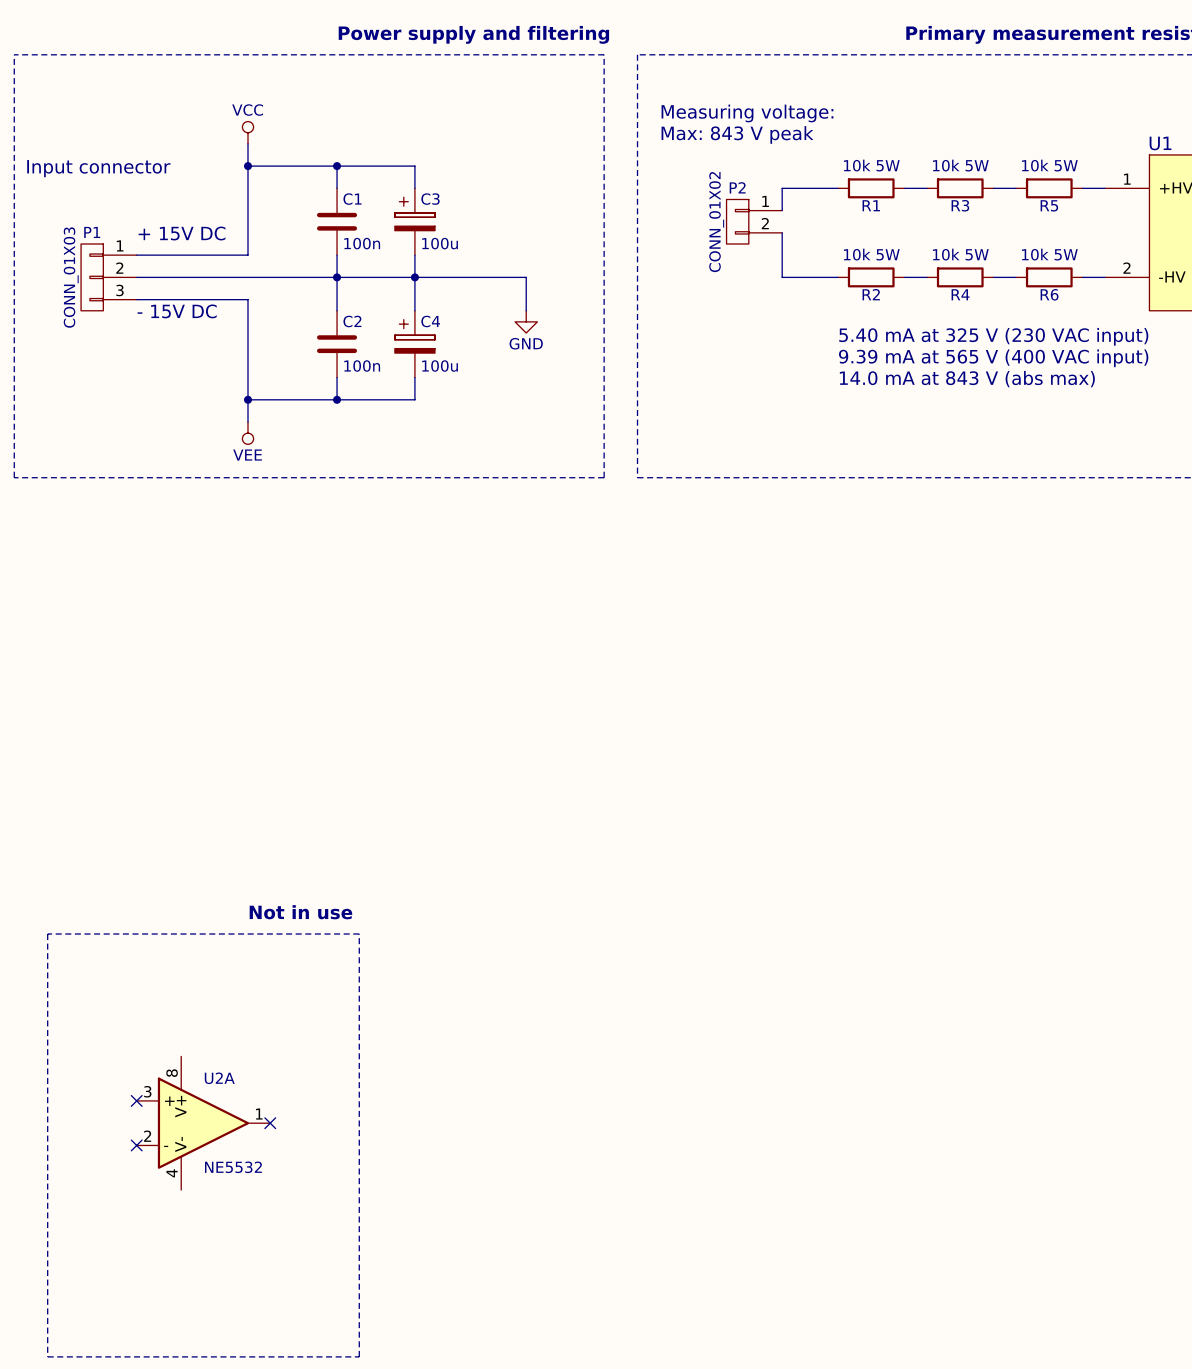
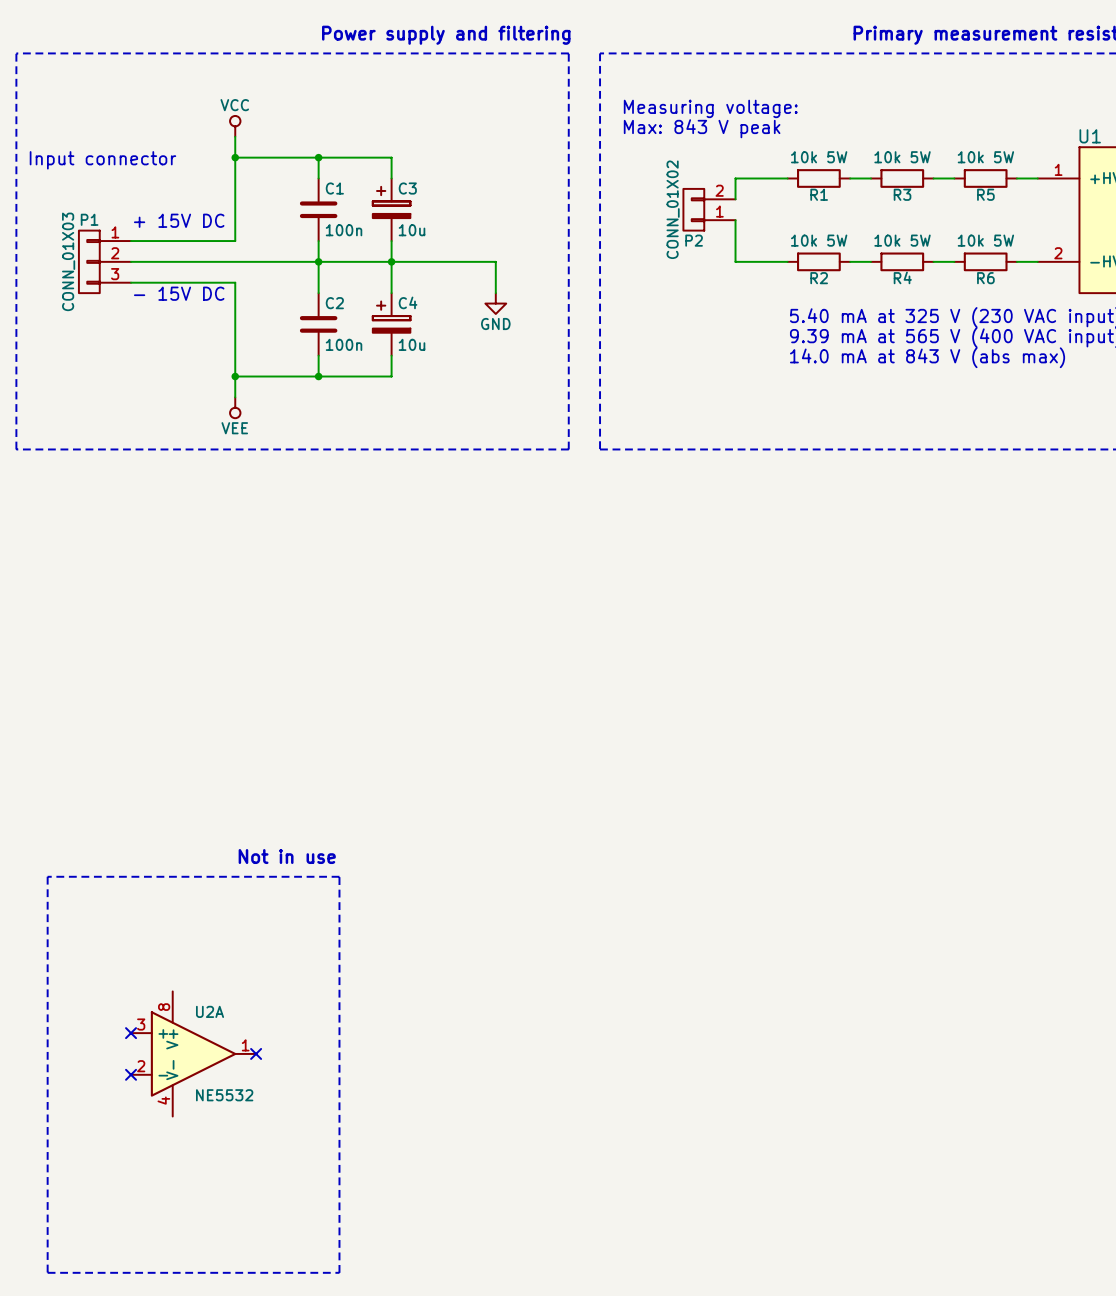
P2 flip: as is (737, 221) -> up-down (693, 209)
C3 value: 100u (440, 243) -> 10u (412, 230)
C4 value: 100u (440, 366) -> 10u (412, 344)

